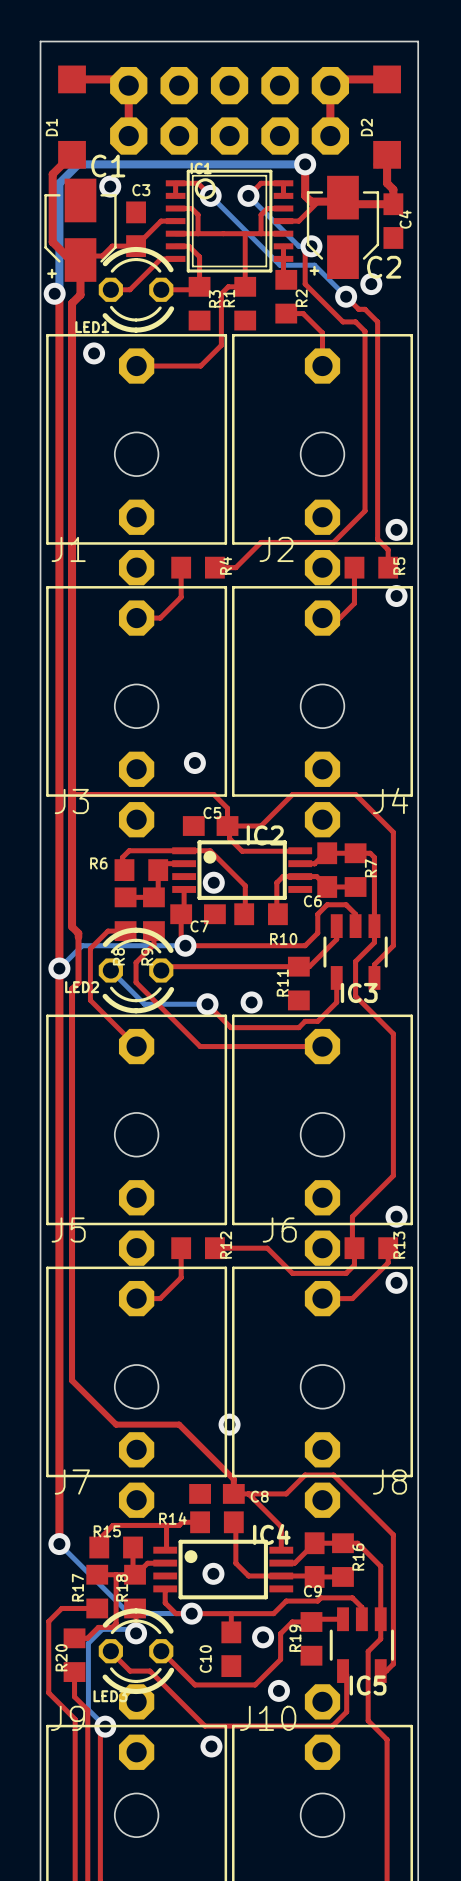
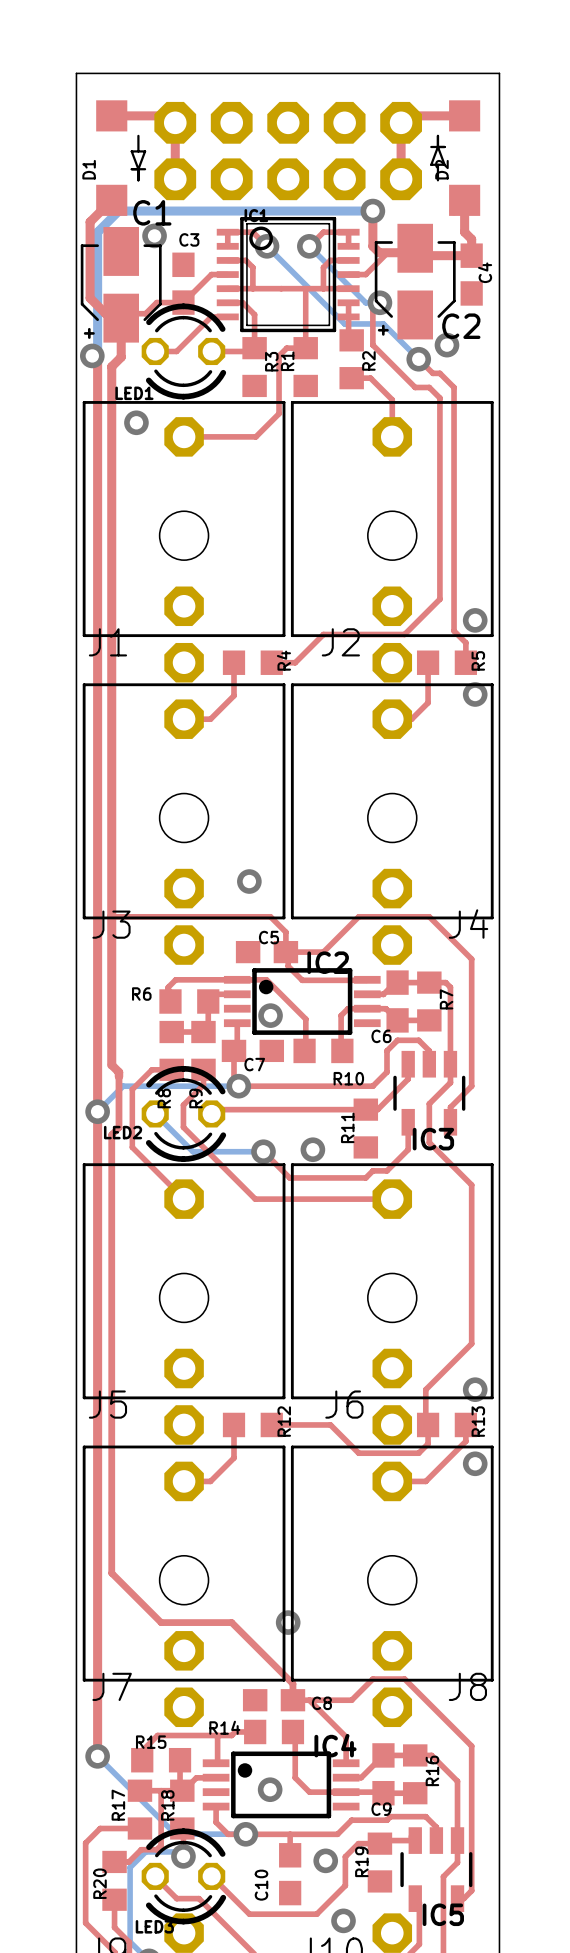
D1 footprint: [58, 65, 86, 169] -> [96, 100, 147, 216]
D2 footprint: [373, 65, 401, 169] -> [430, 100, 481, 216]

